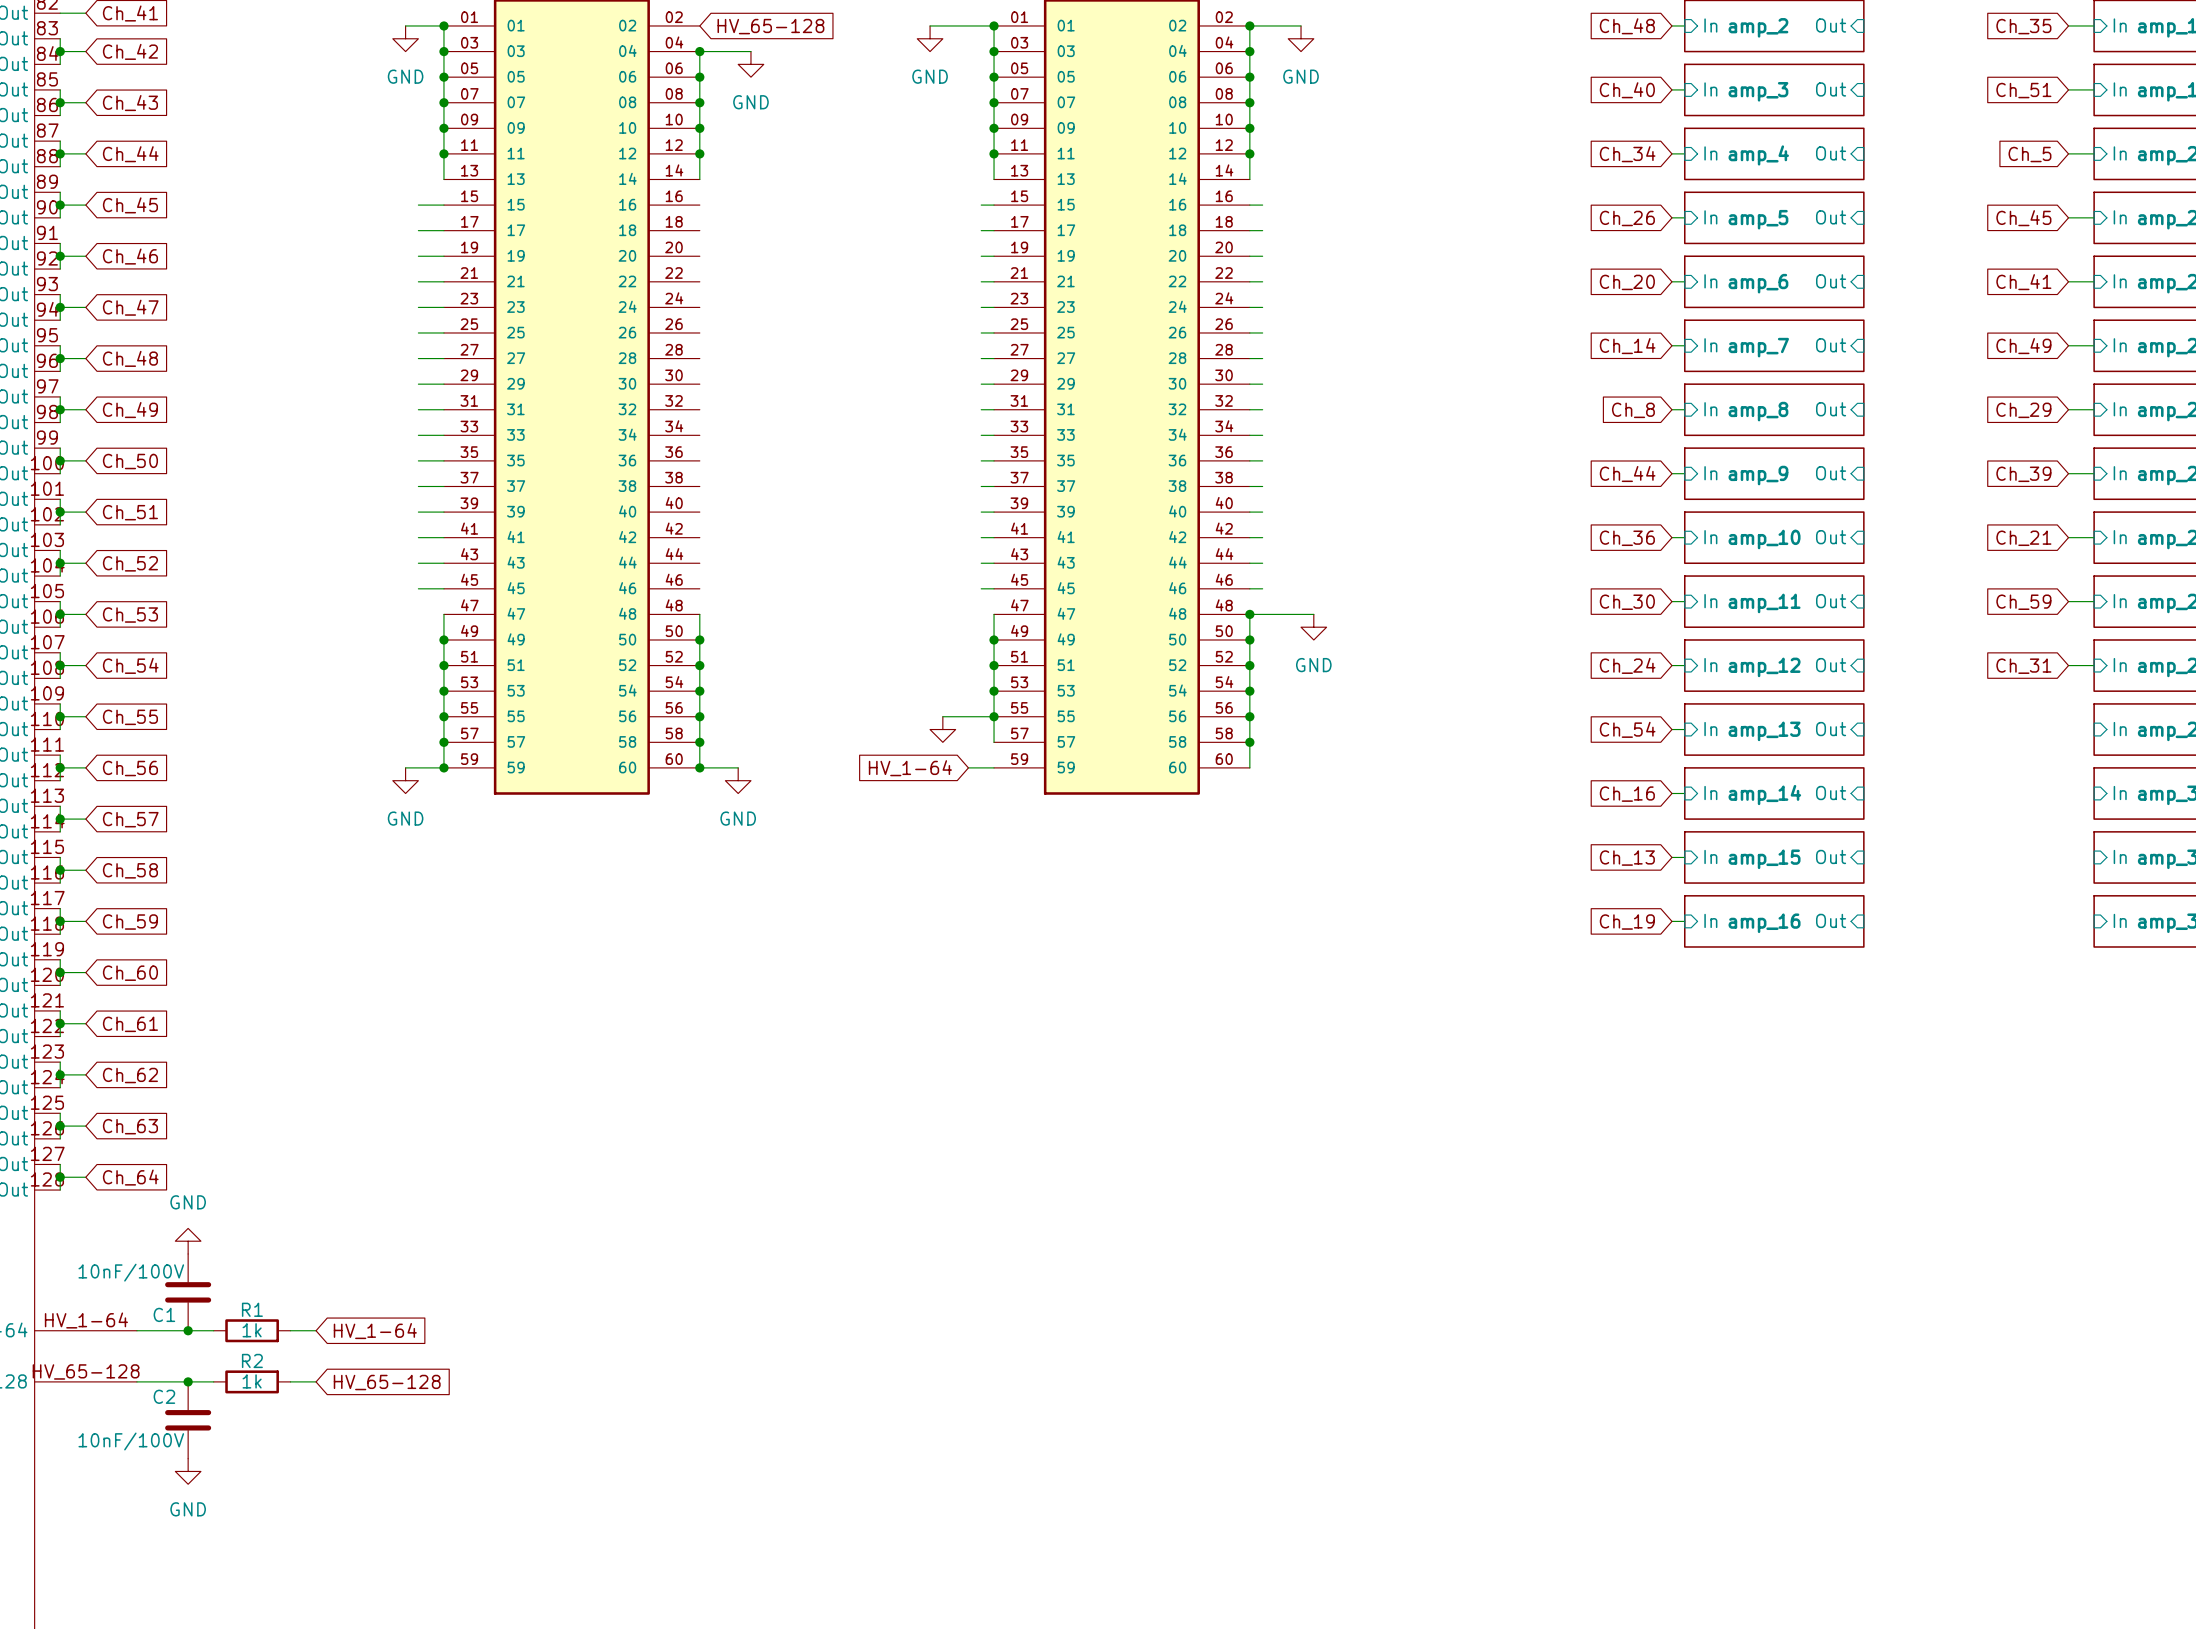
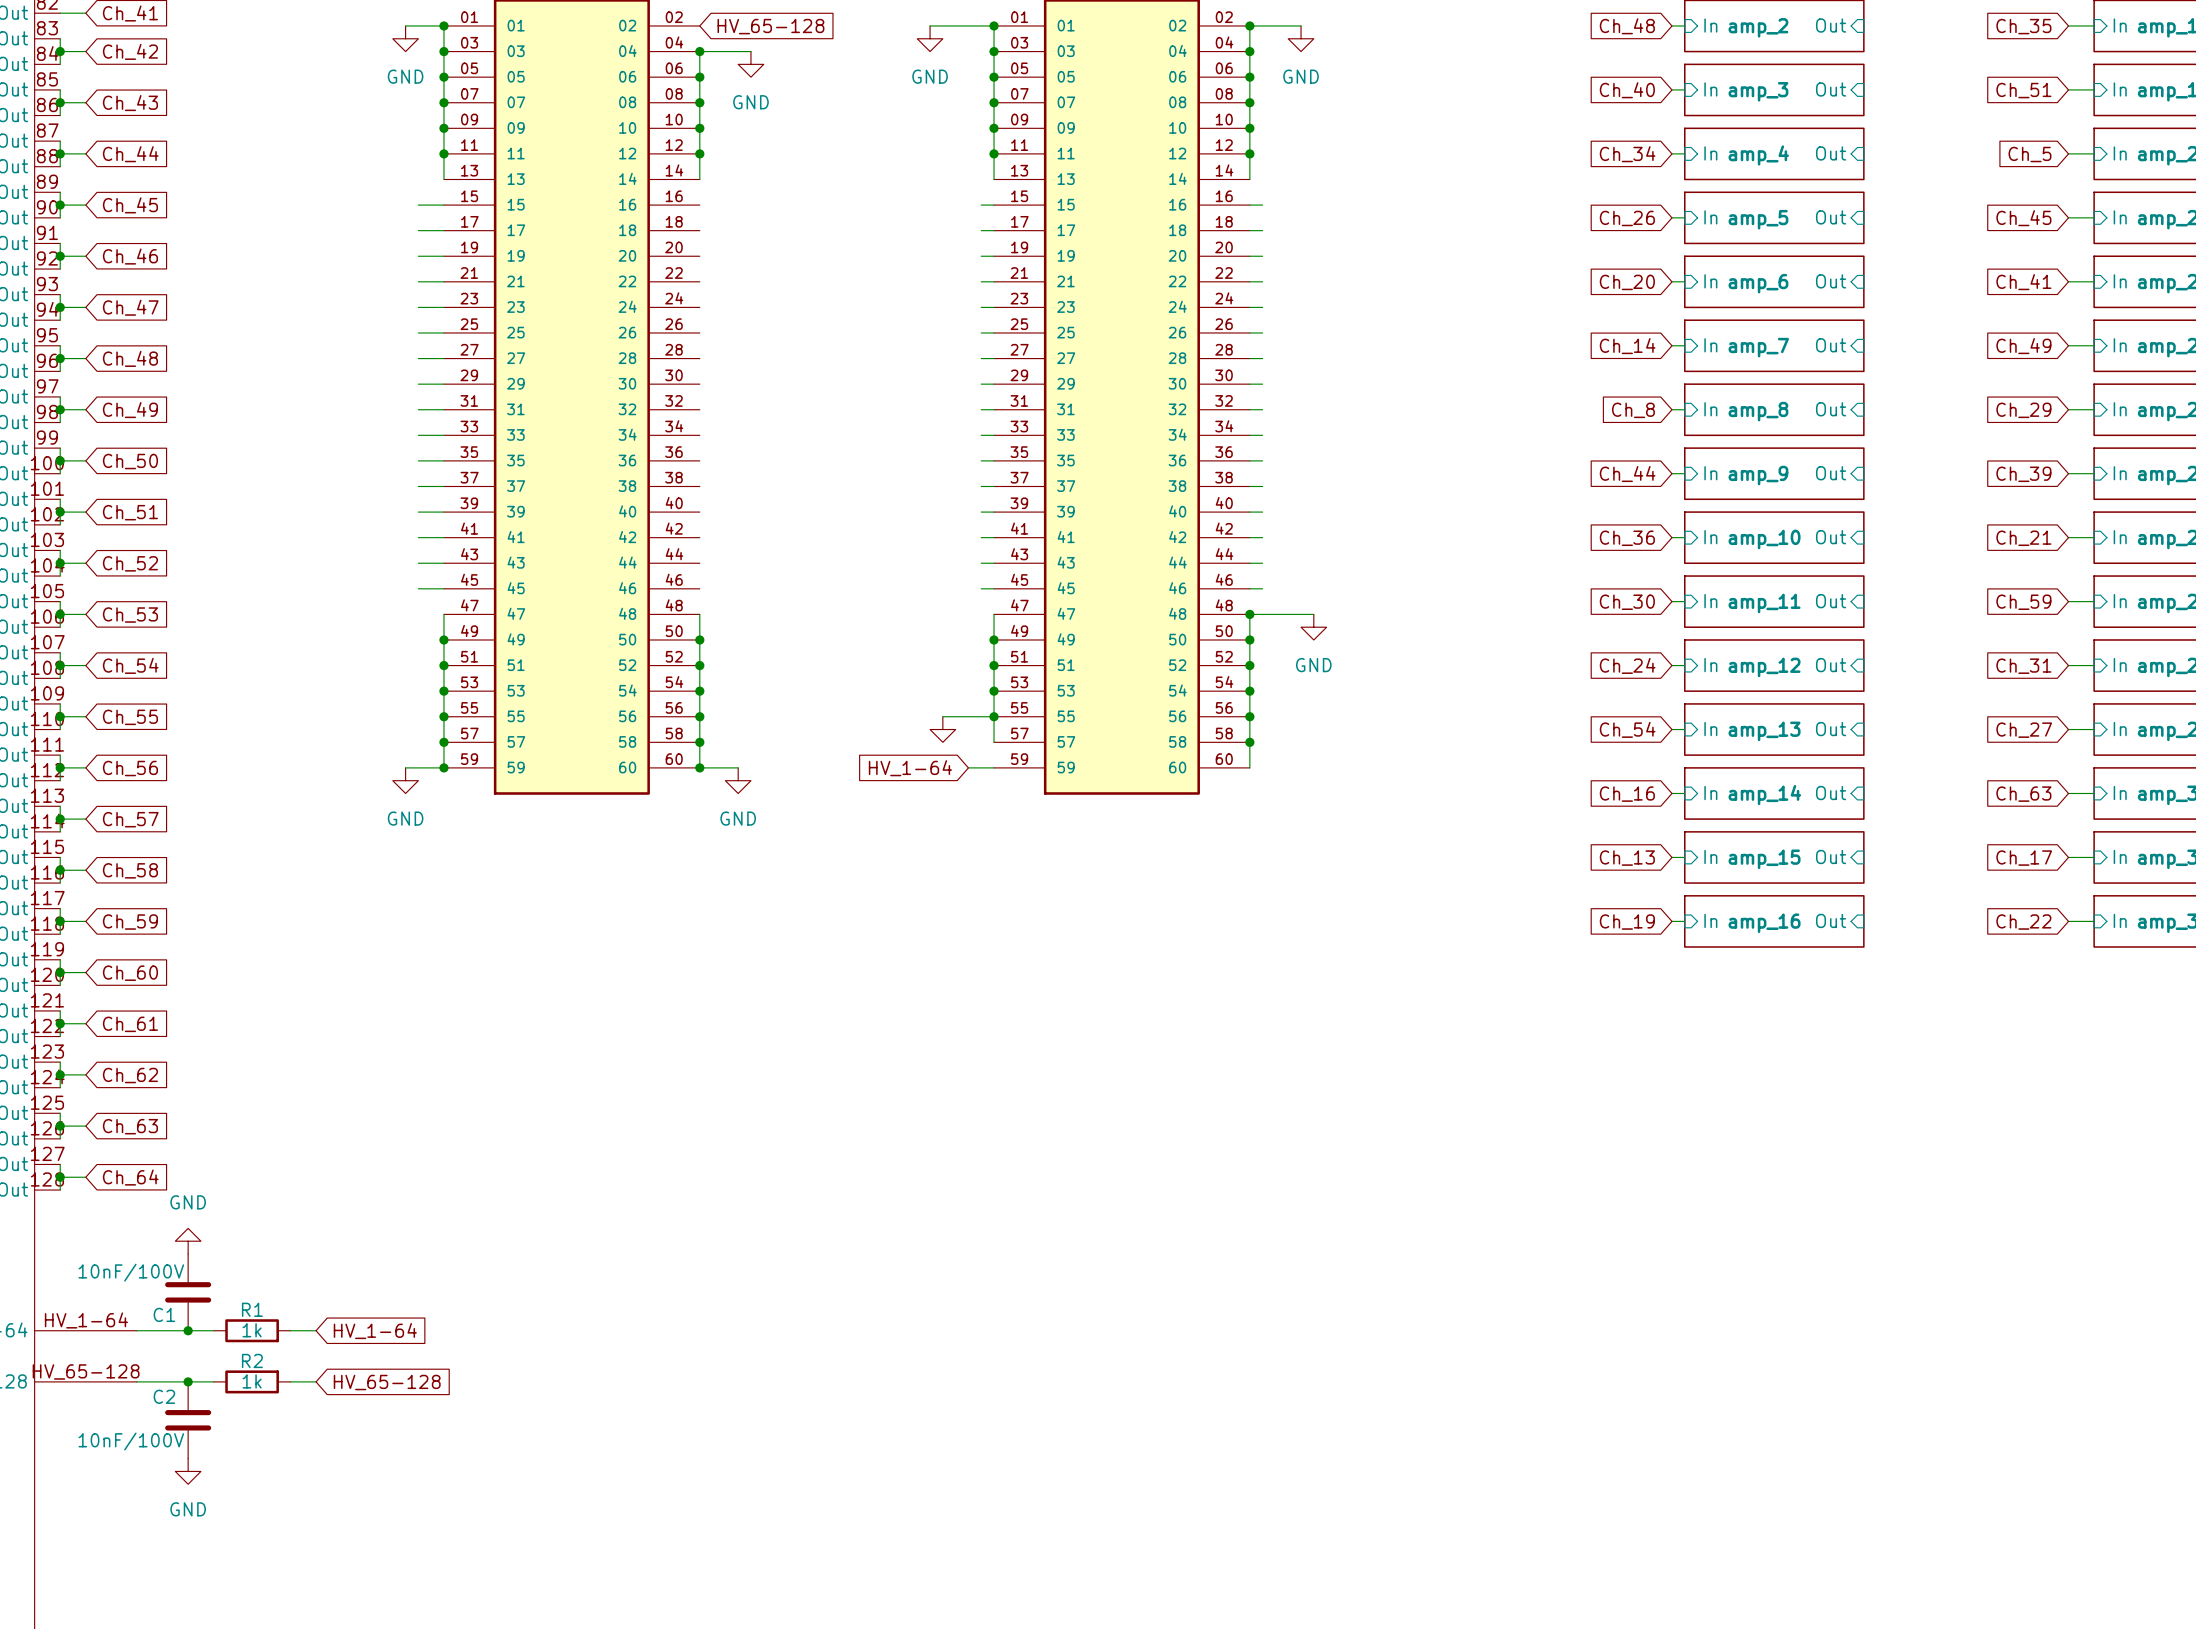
wire: none -> (2068, 729) (2094, 729)
global label: none -> Ch_27 (2024, 730)
wire: none -> (2068, 793) (2094, 793)
global label: none -> Ch_63 (2023, 794)
wire: none -> (2068, 857) (2094, 857)
global label: none -> Ch_17 (2024, 858)
wire: none -> (2068, 921) (2094, 921)
global label: none -> Ch_22 (2023, 922)

